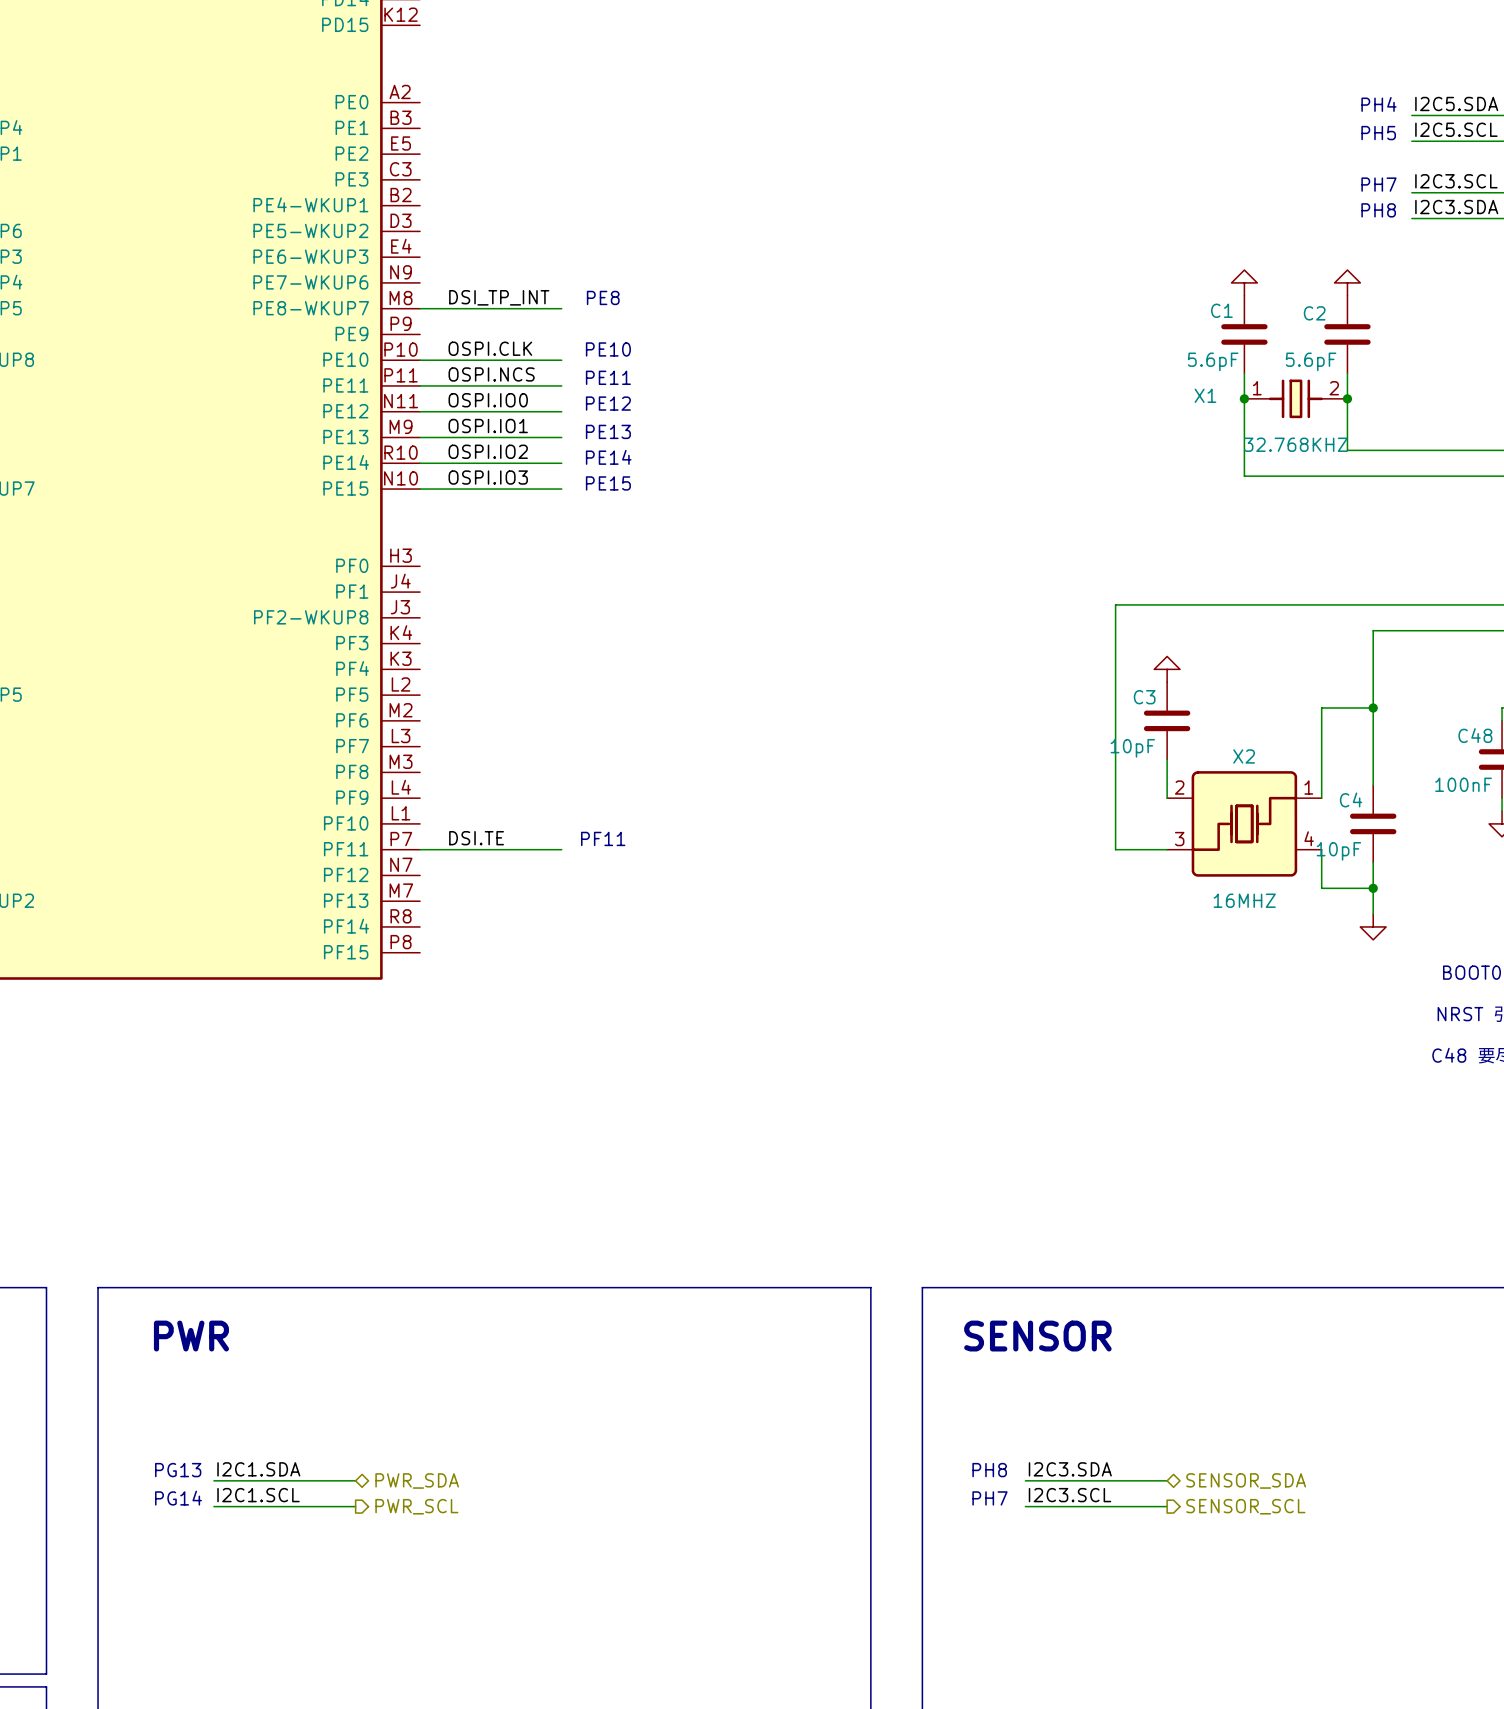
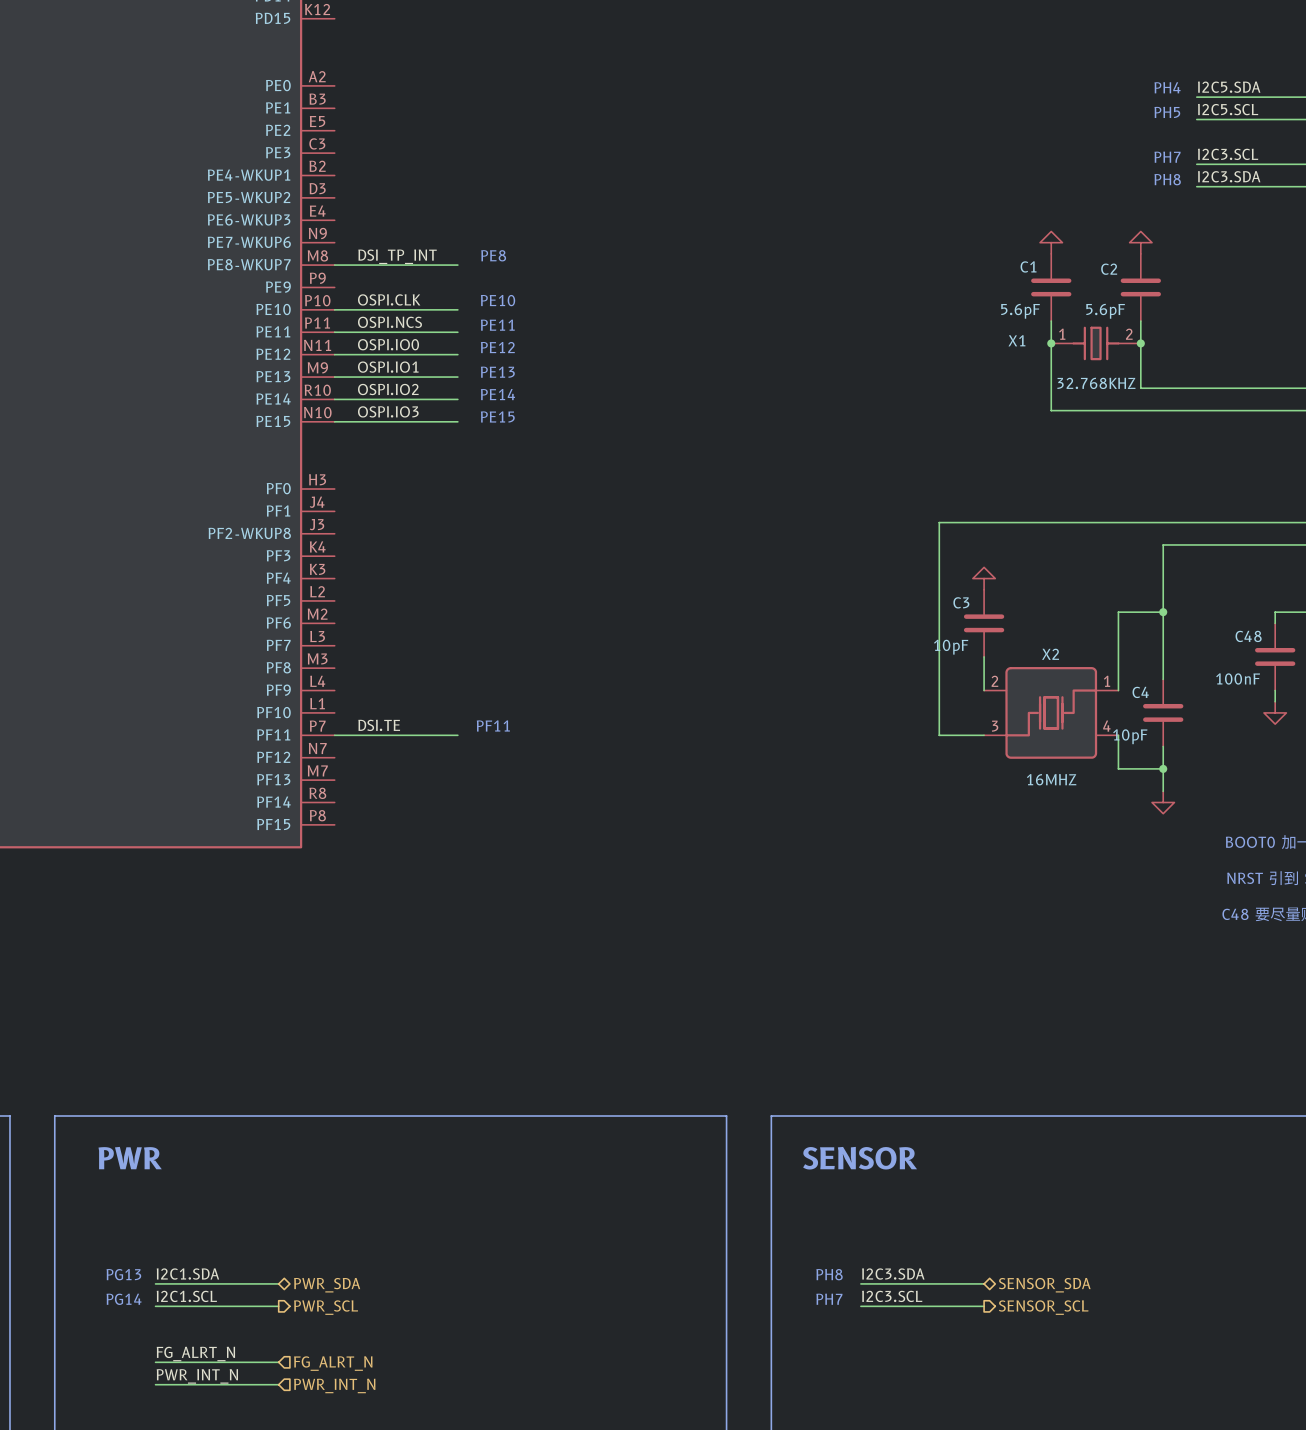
label: none -> FG_ALRT_N (195, 1354)
wire: none -> (155, 1362) (278, 1362)
hierarchical label: none -> FG_ALRT_N (333, 1363)
label: none -> PWR_INT_N (197, 1376)
wire: none -> (155, 1384) (278, 1384)
hierarchical label: none -> PWR_INT_N (334, 1385)

